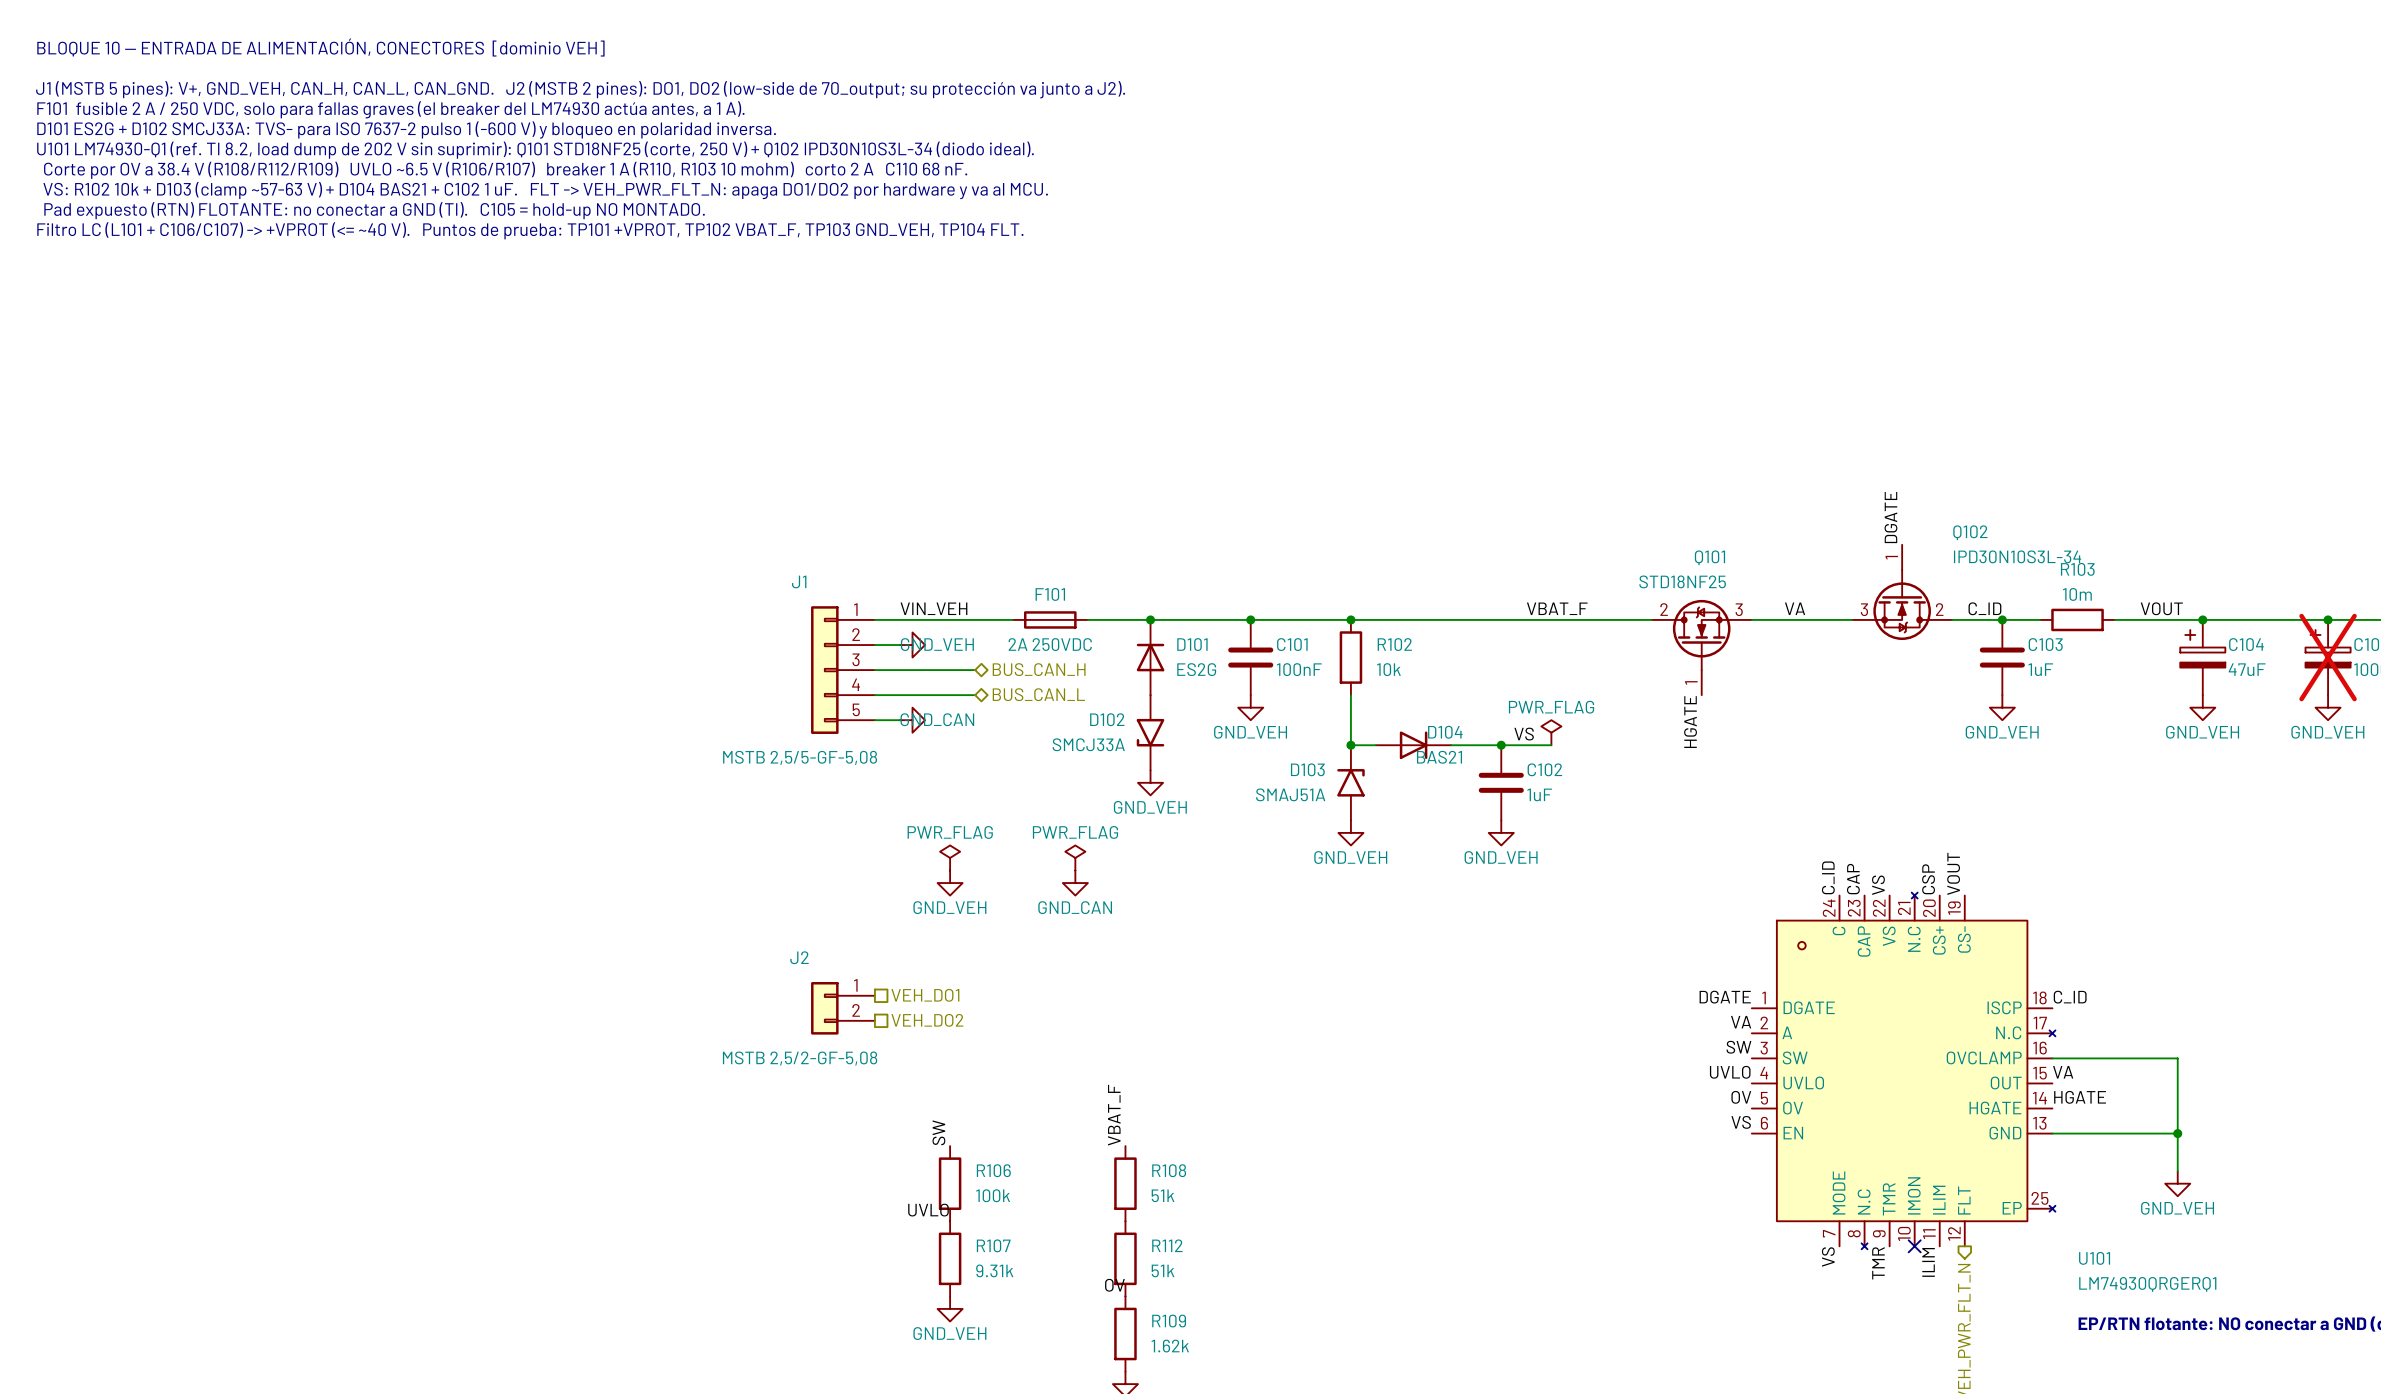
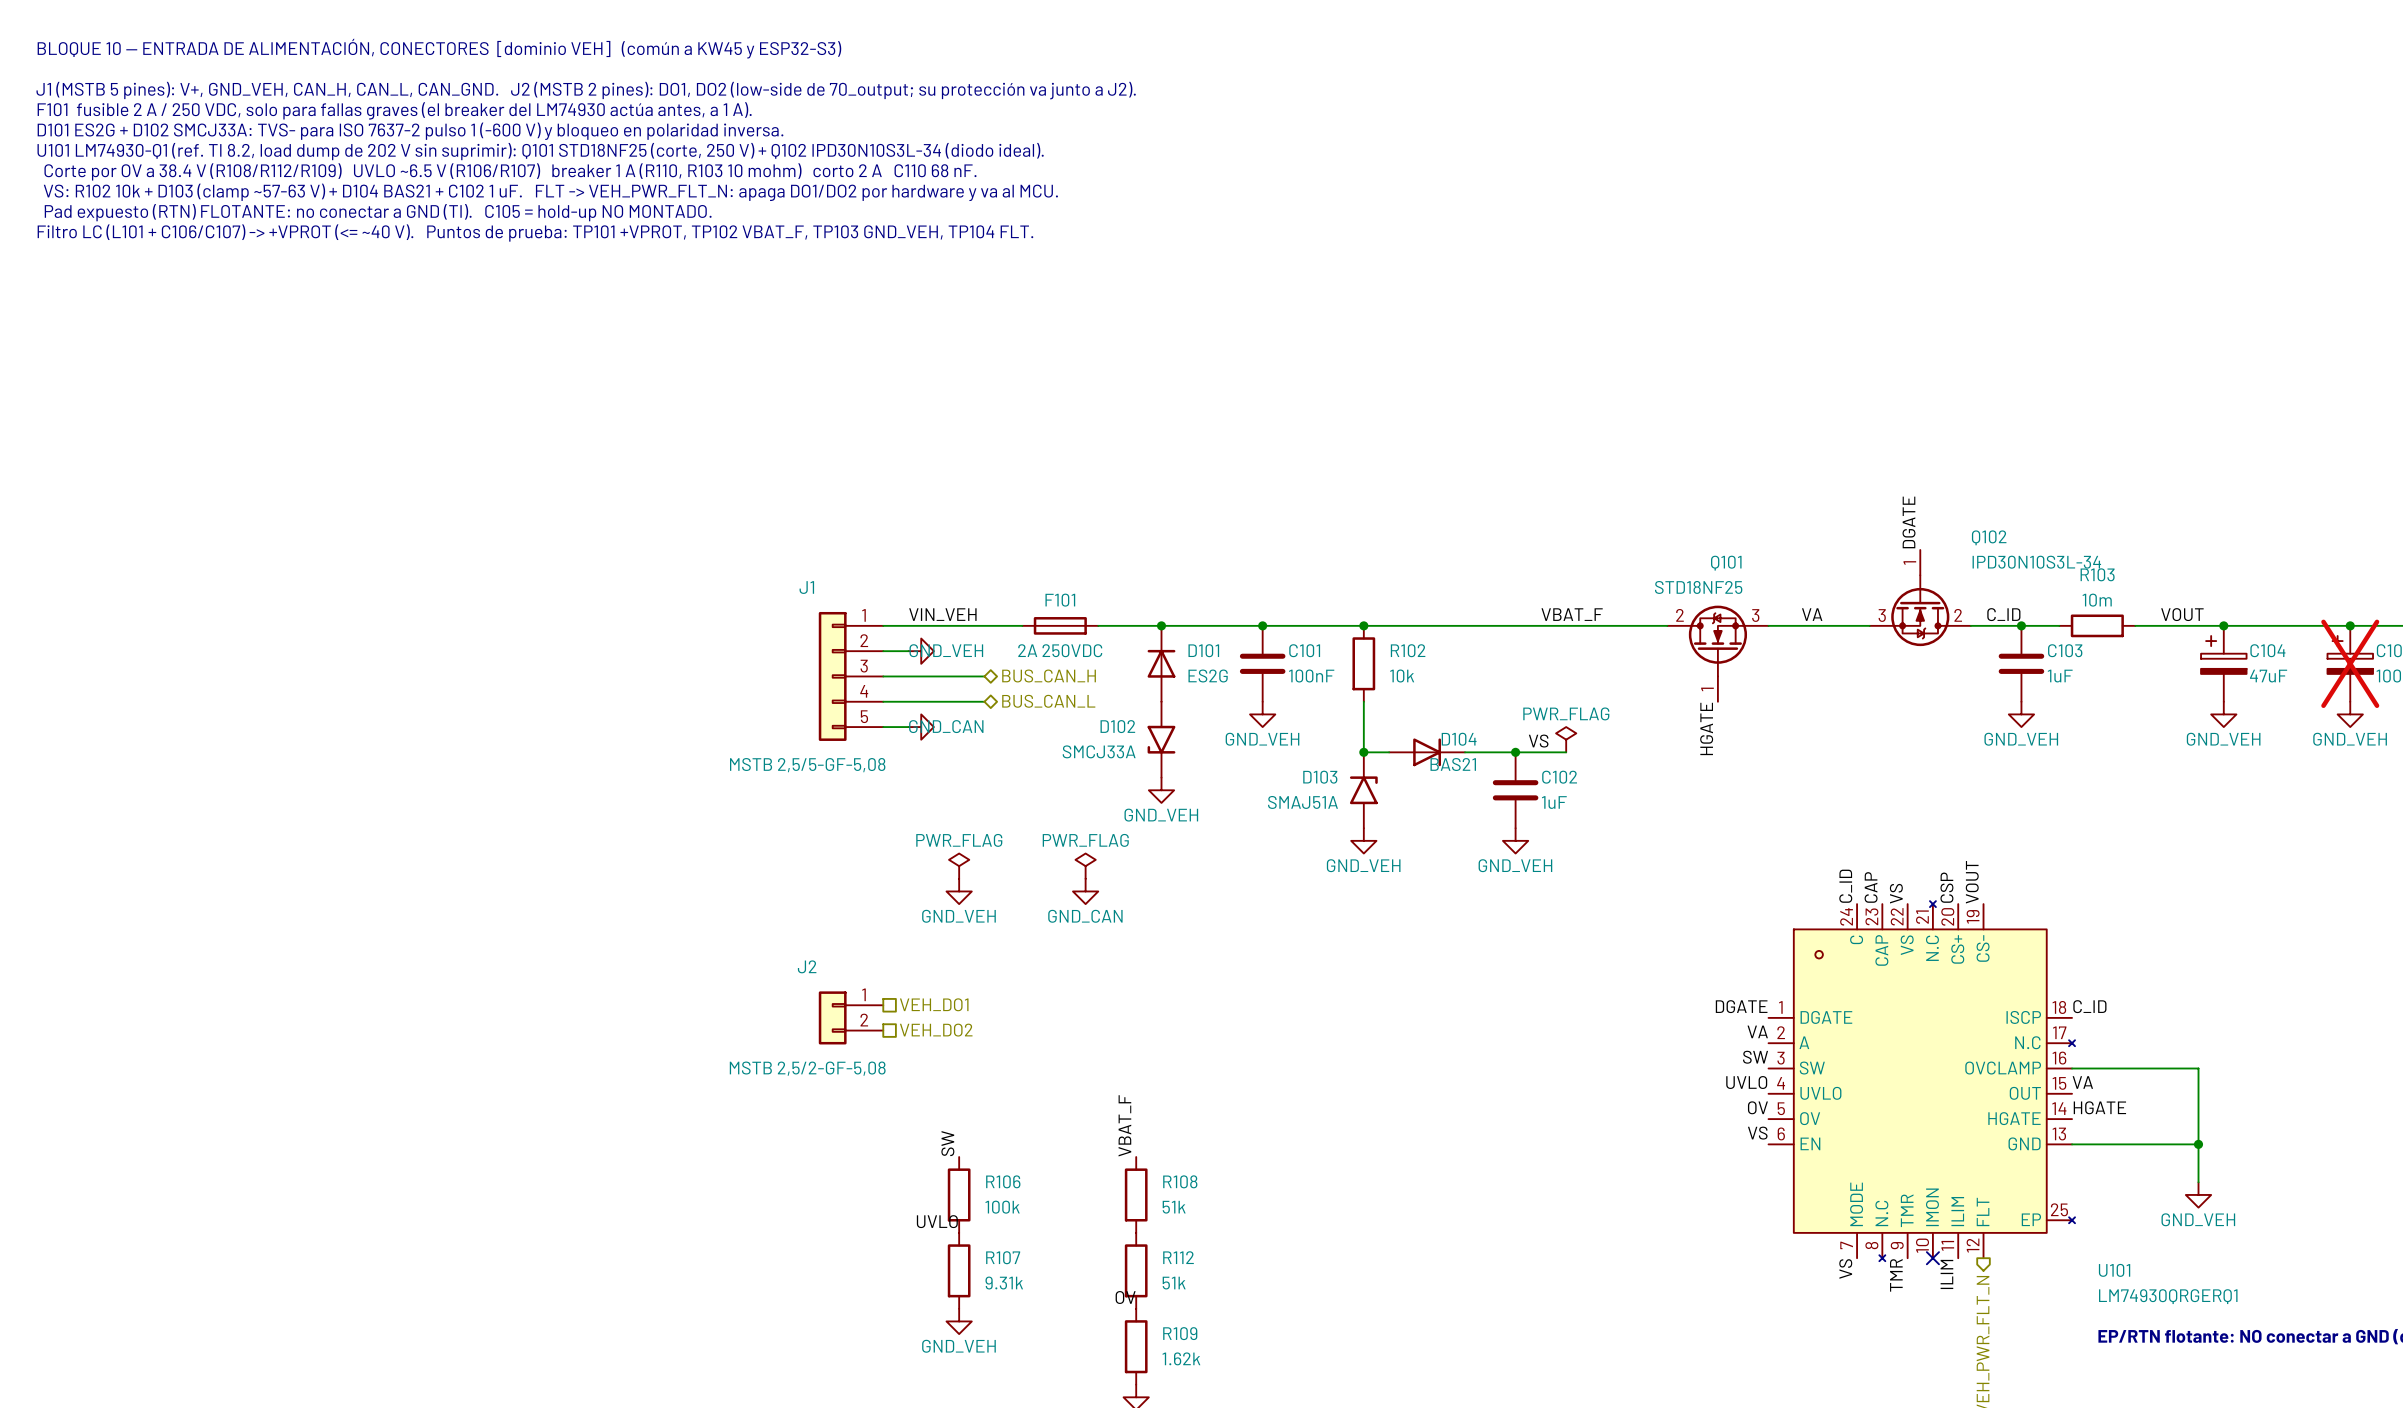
text: BLOQUE 10 — ENTRADA DE ALIMENTACIÓN, CONECTORES [dominio VEH] (320, 47) -> BLOQUE 10 — ENTRADA DE ALIMENTACIÓN, CONECTORES [dominio VEH] (común a KW45 y ESP32-S3) (439, 48)

